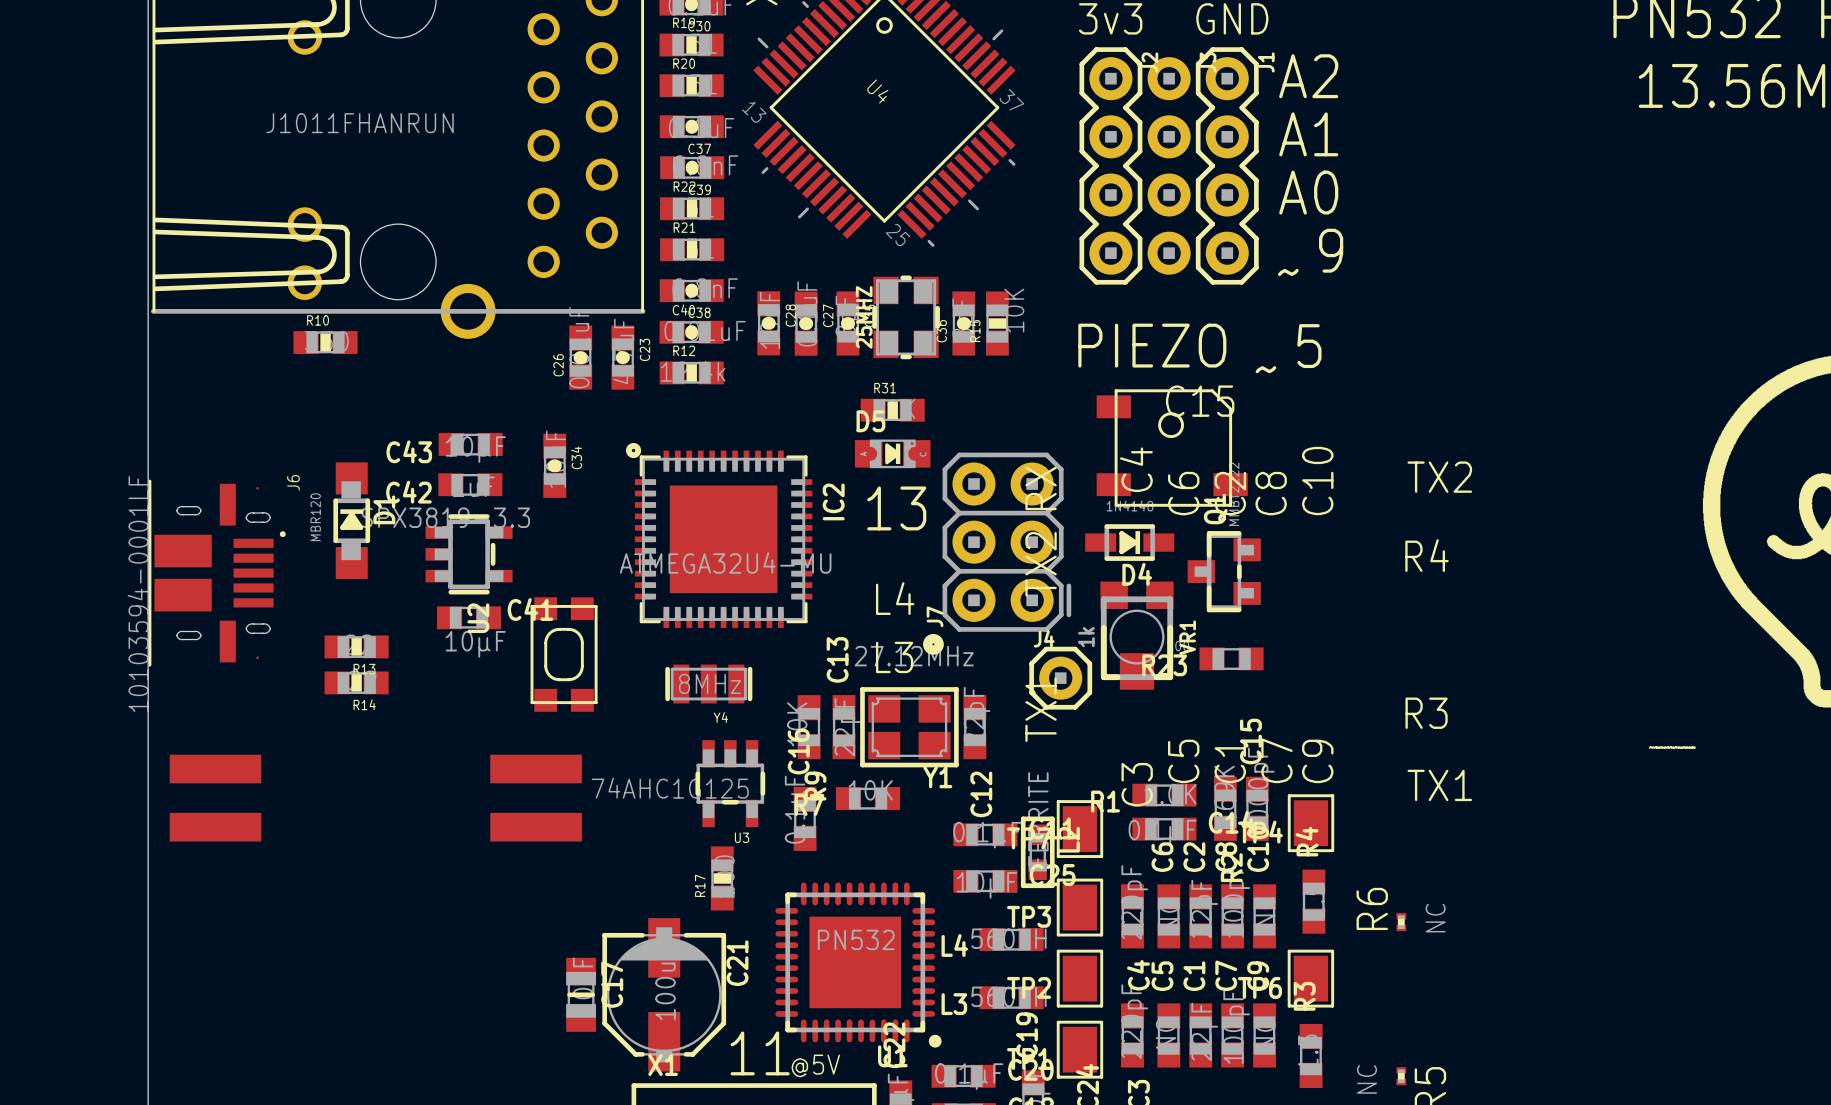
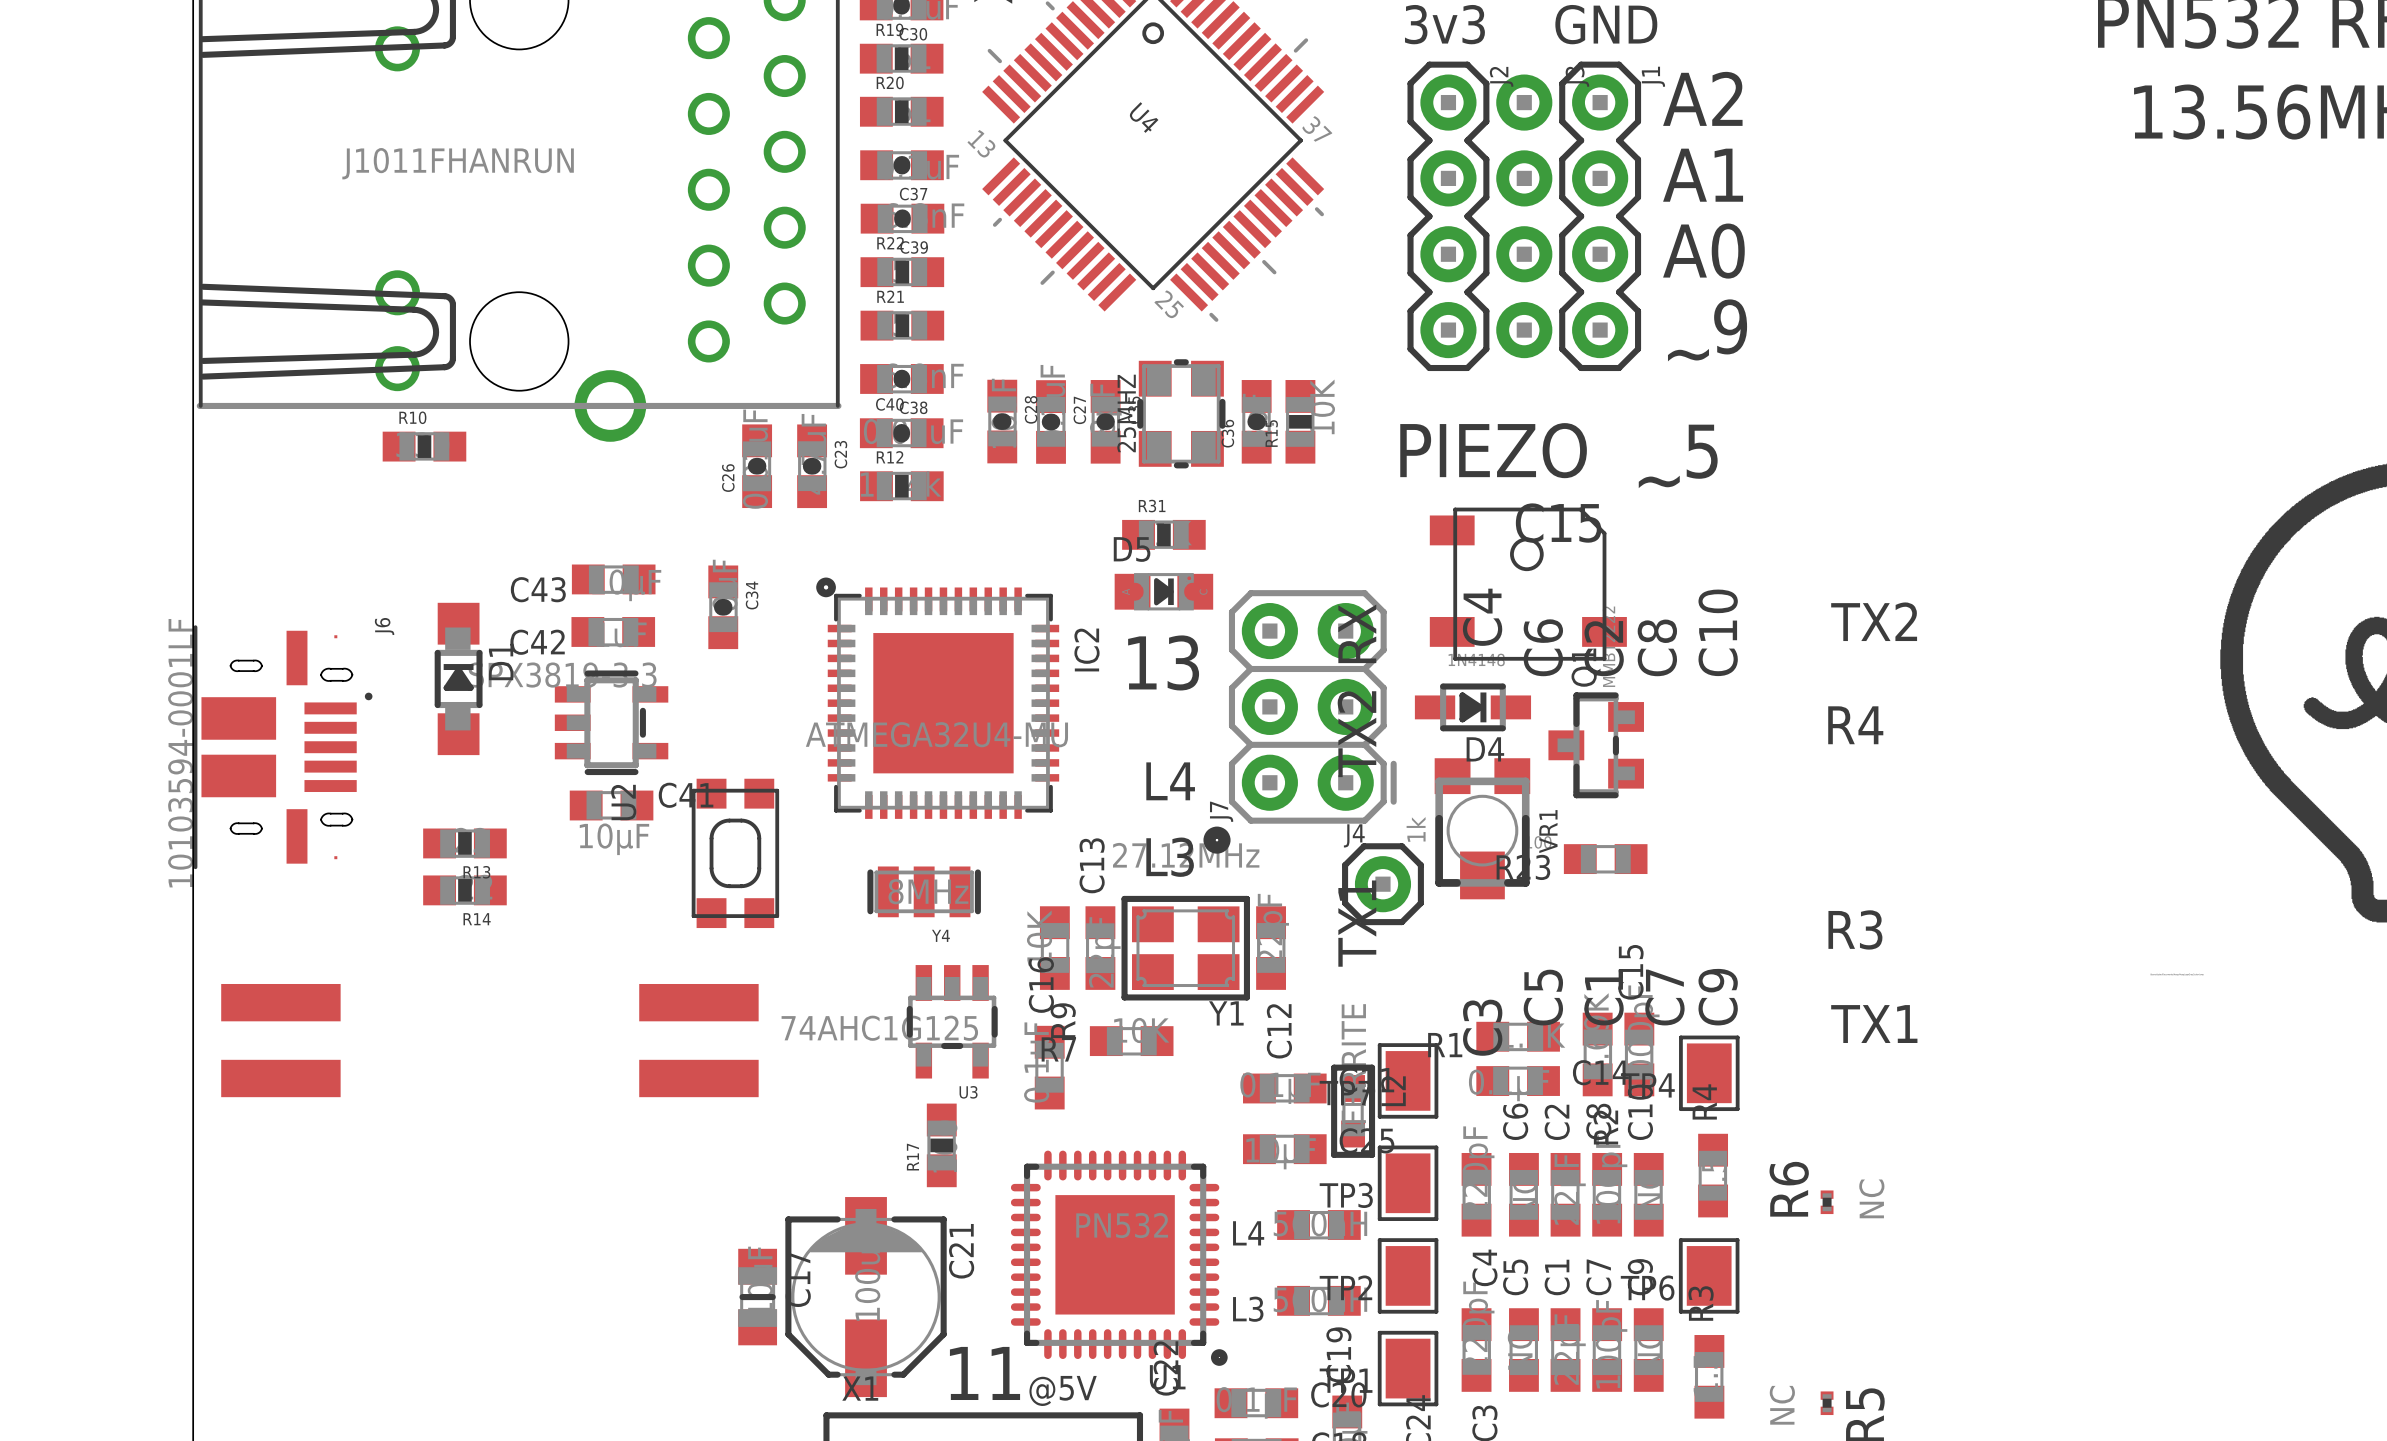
D1 value: MBR120 (315, 517) -> none

